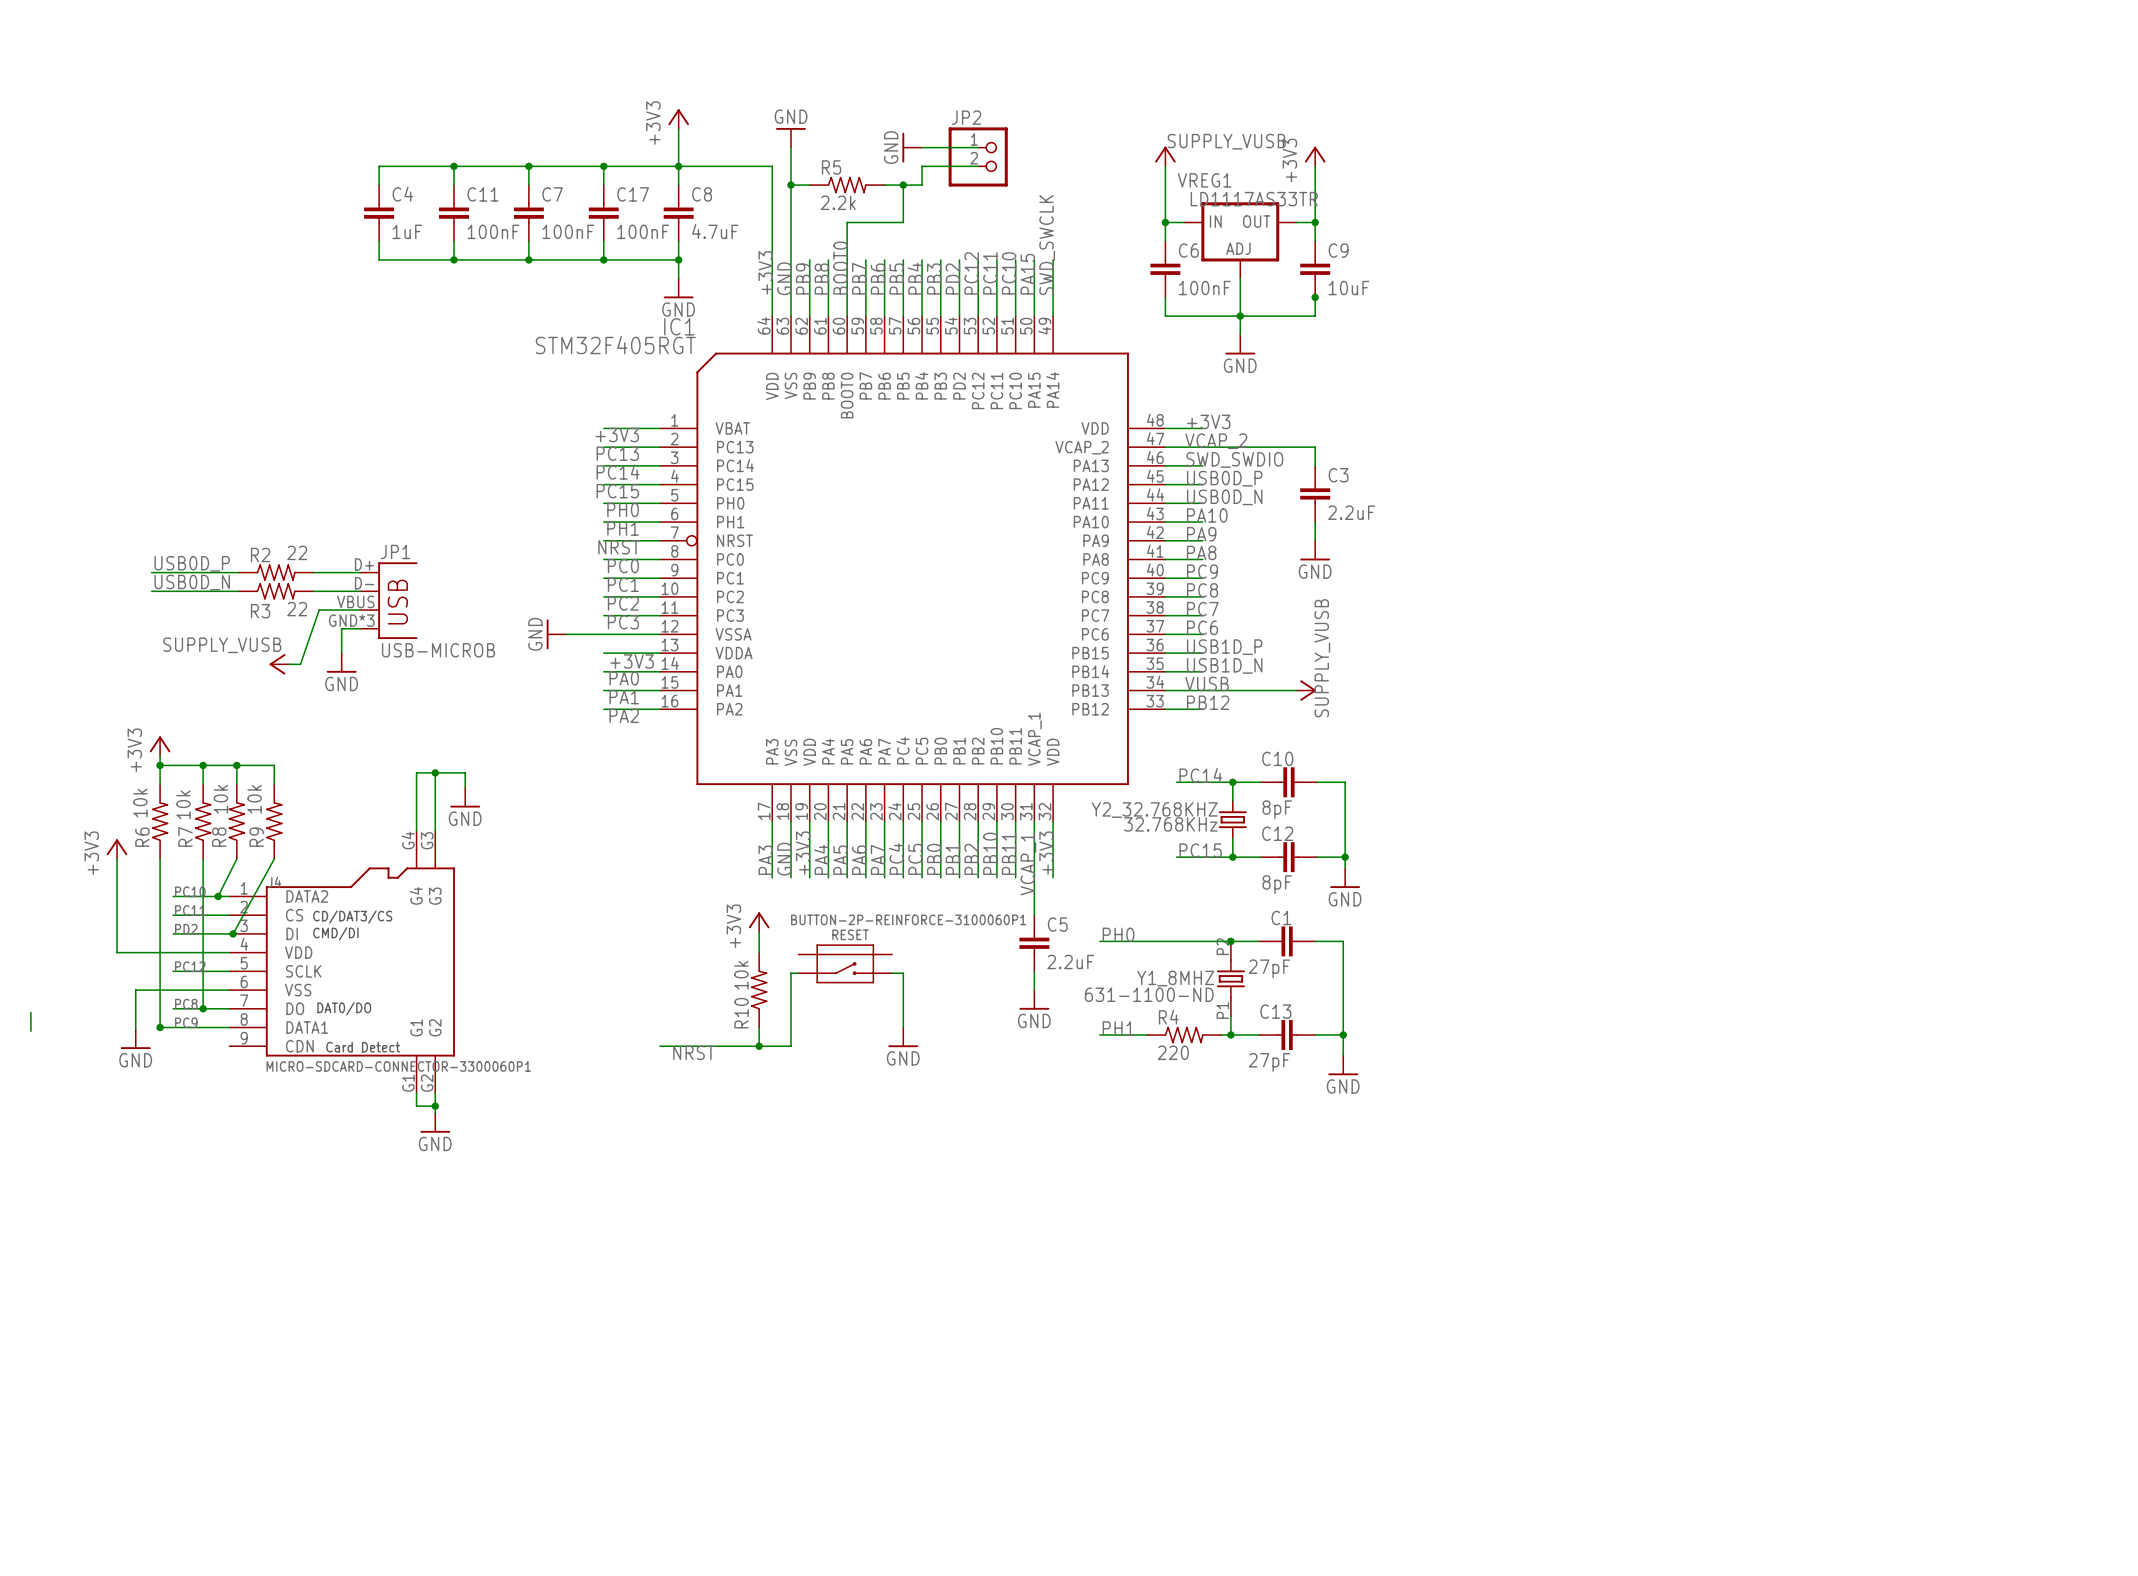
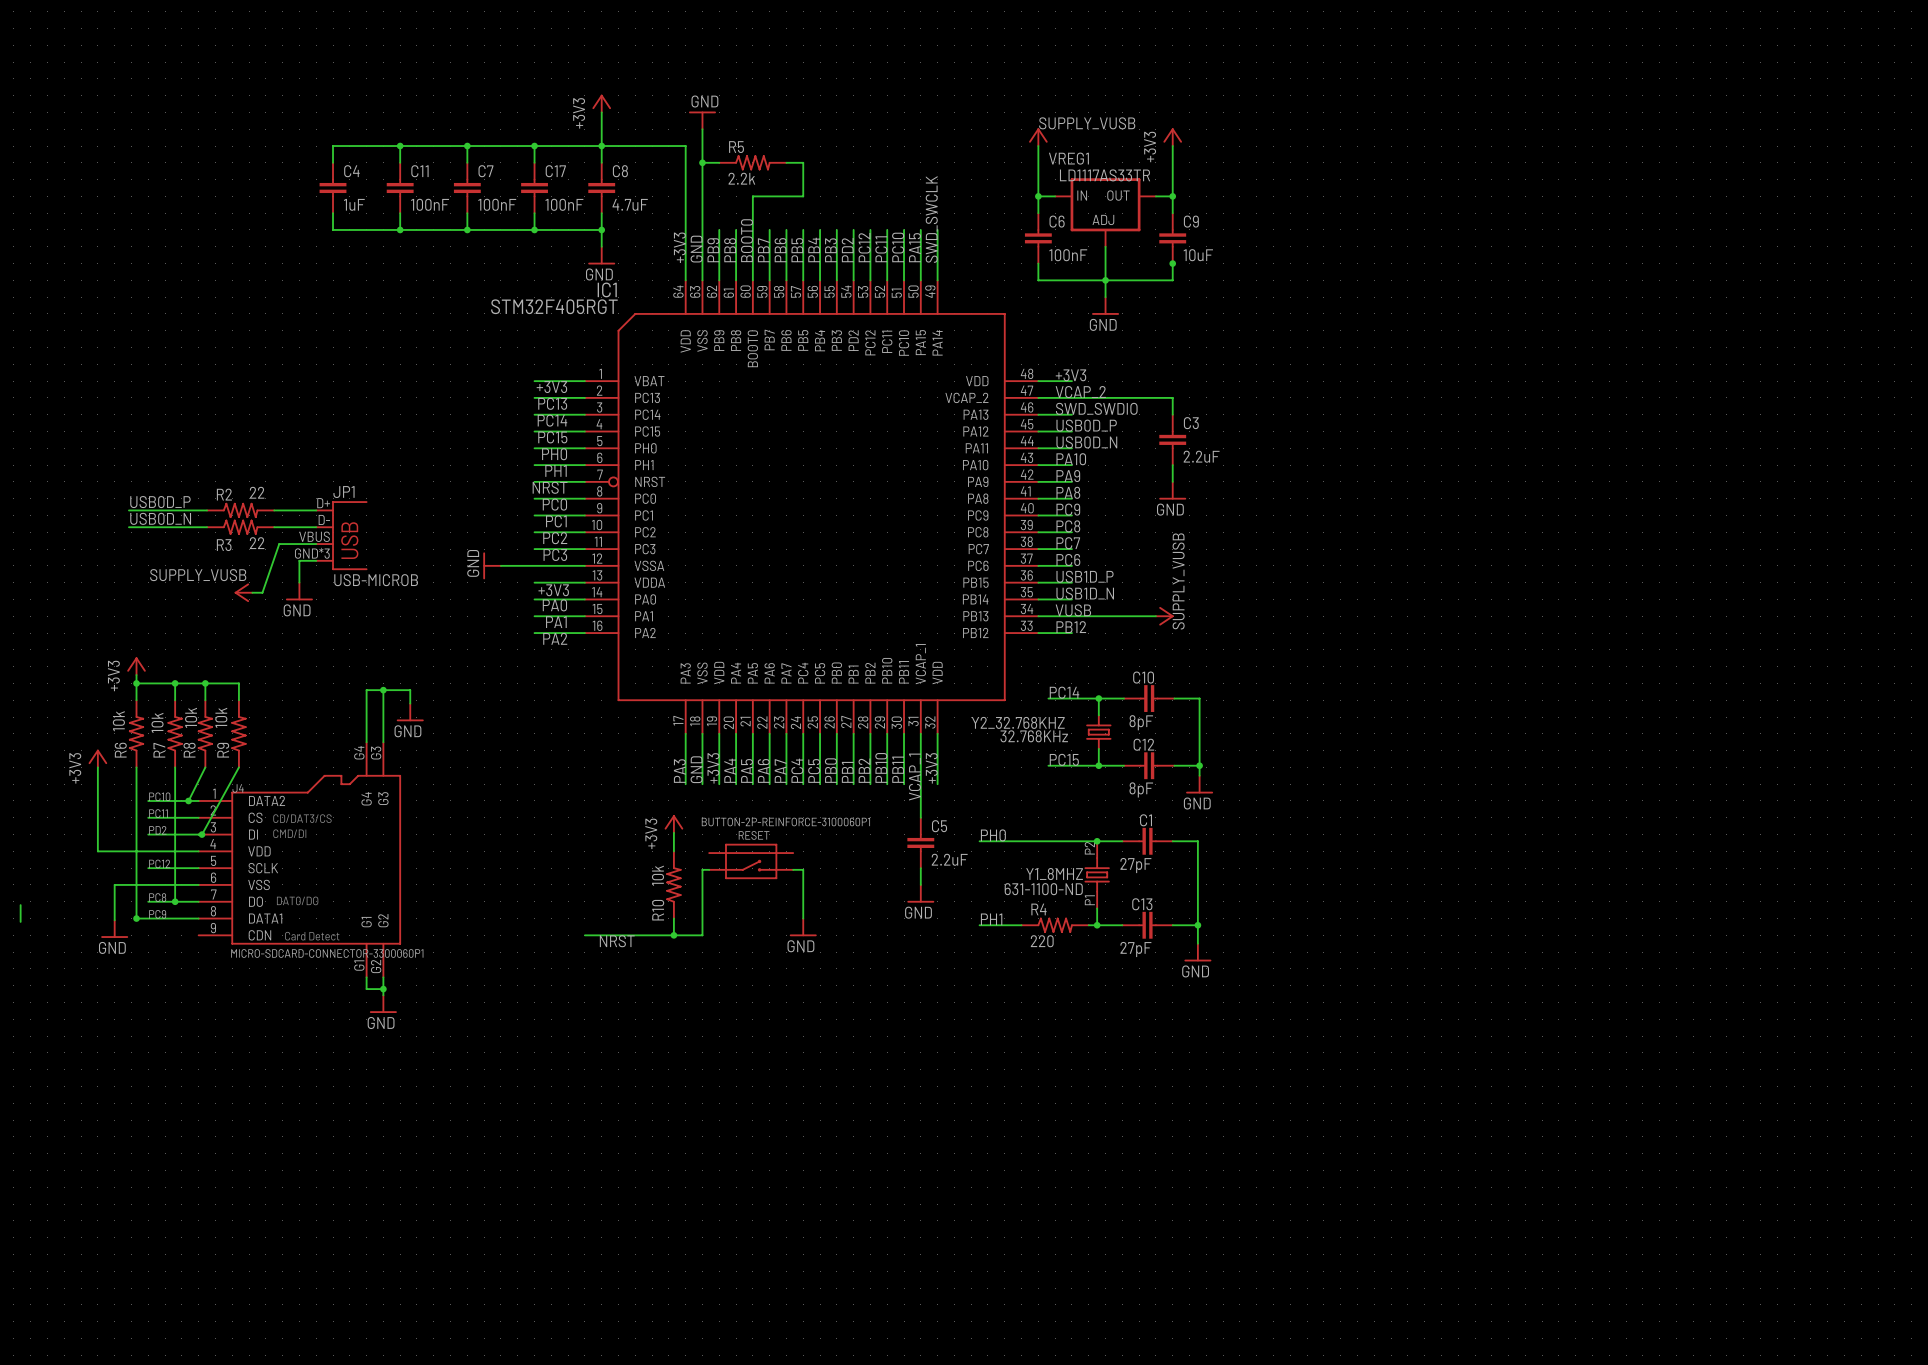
power symbol: GND (912, 147) -> none
wire: (922, 147) (978, 147) -> none
JP2: (978, 156) -> none
wire: (978, 166) (922, 166) (922, 185) (903, 185) -> none
junction: (903, 185) -> none

